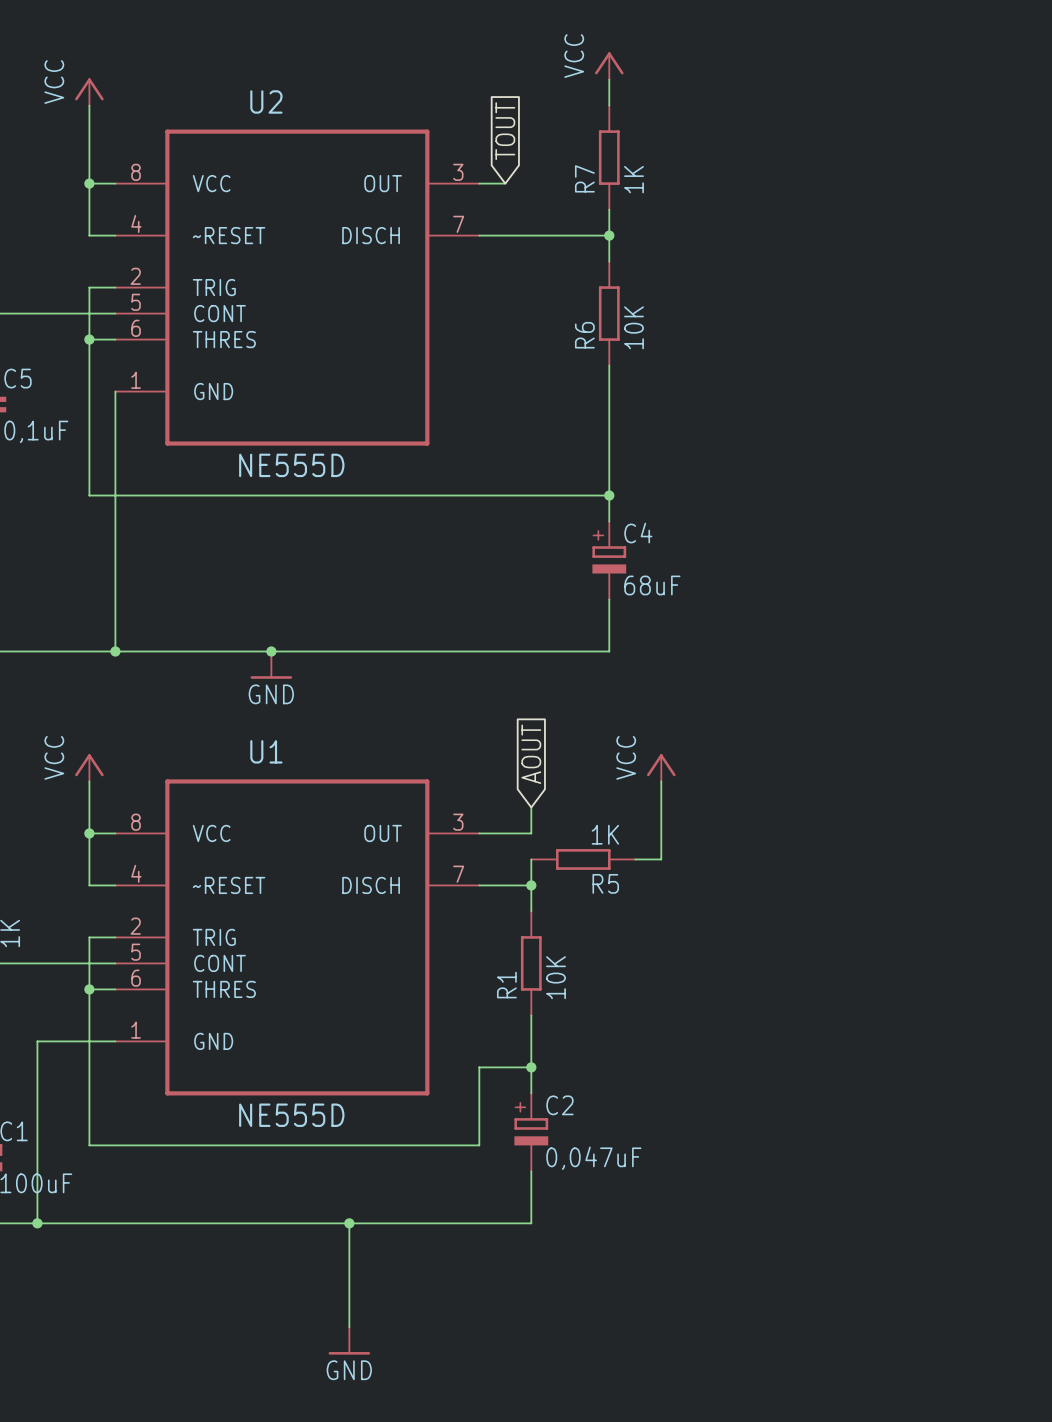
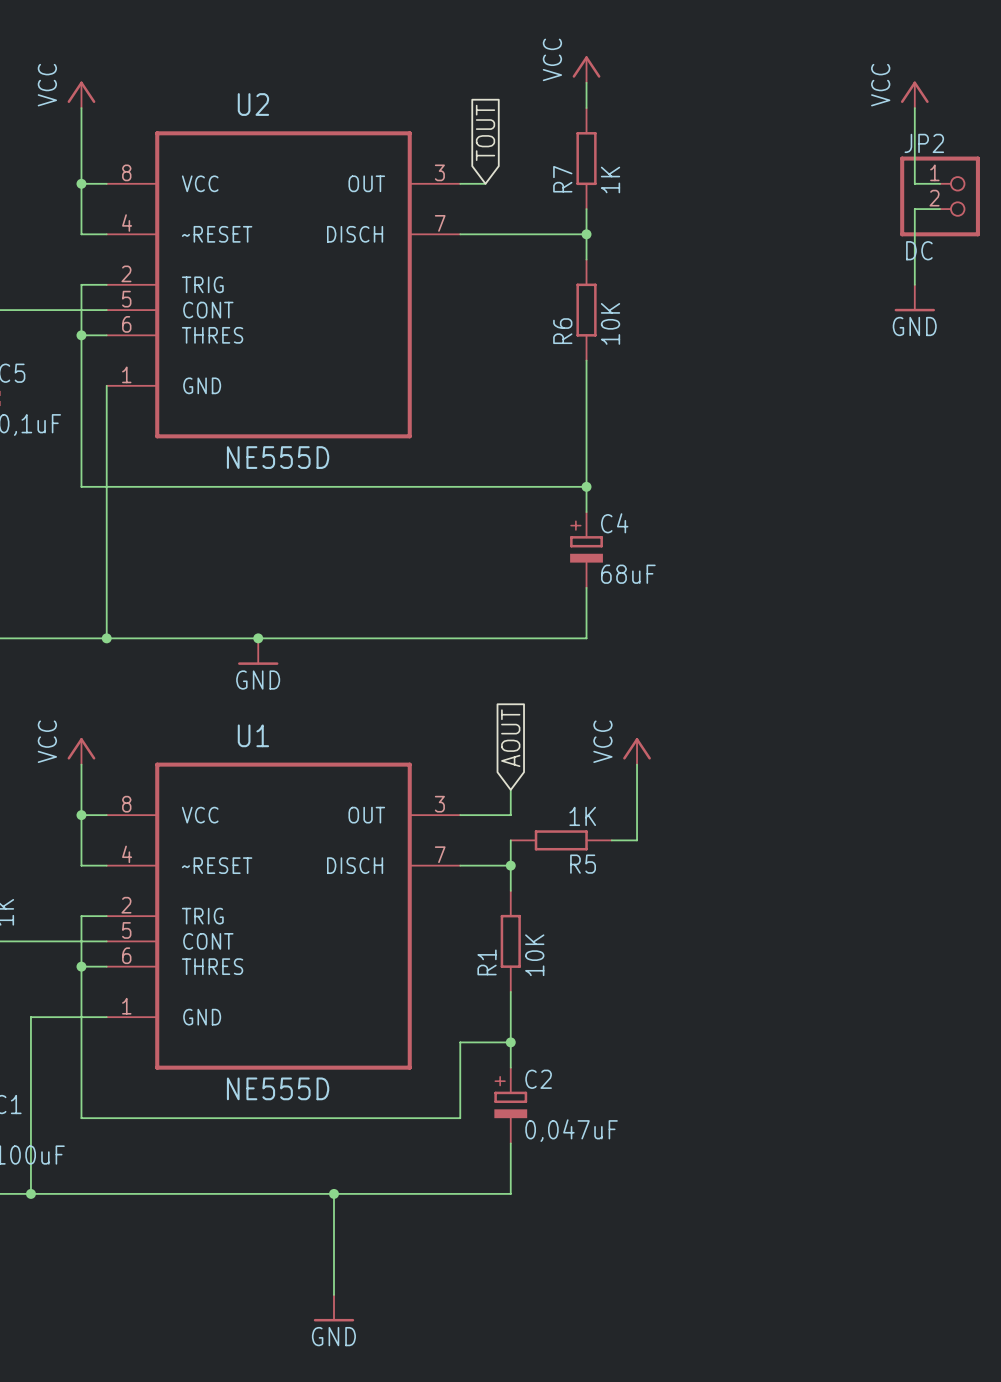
power symbol: none -> VCC (914, 94)
wire: none -> (914, 108) (914, 183) (940, 183)
JP2: none -> DC (940, 196)
wire: none -> (940, 209) (914, 209) (914, 284)
power symbol: none -> GND (914, 298)

